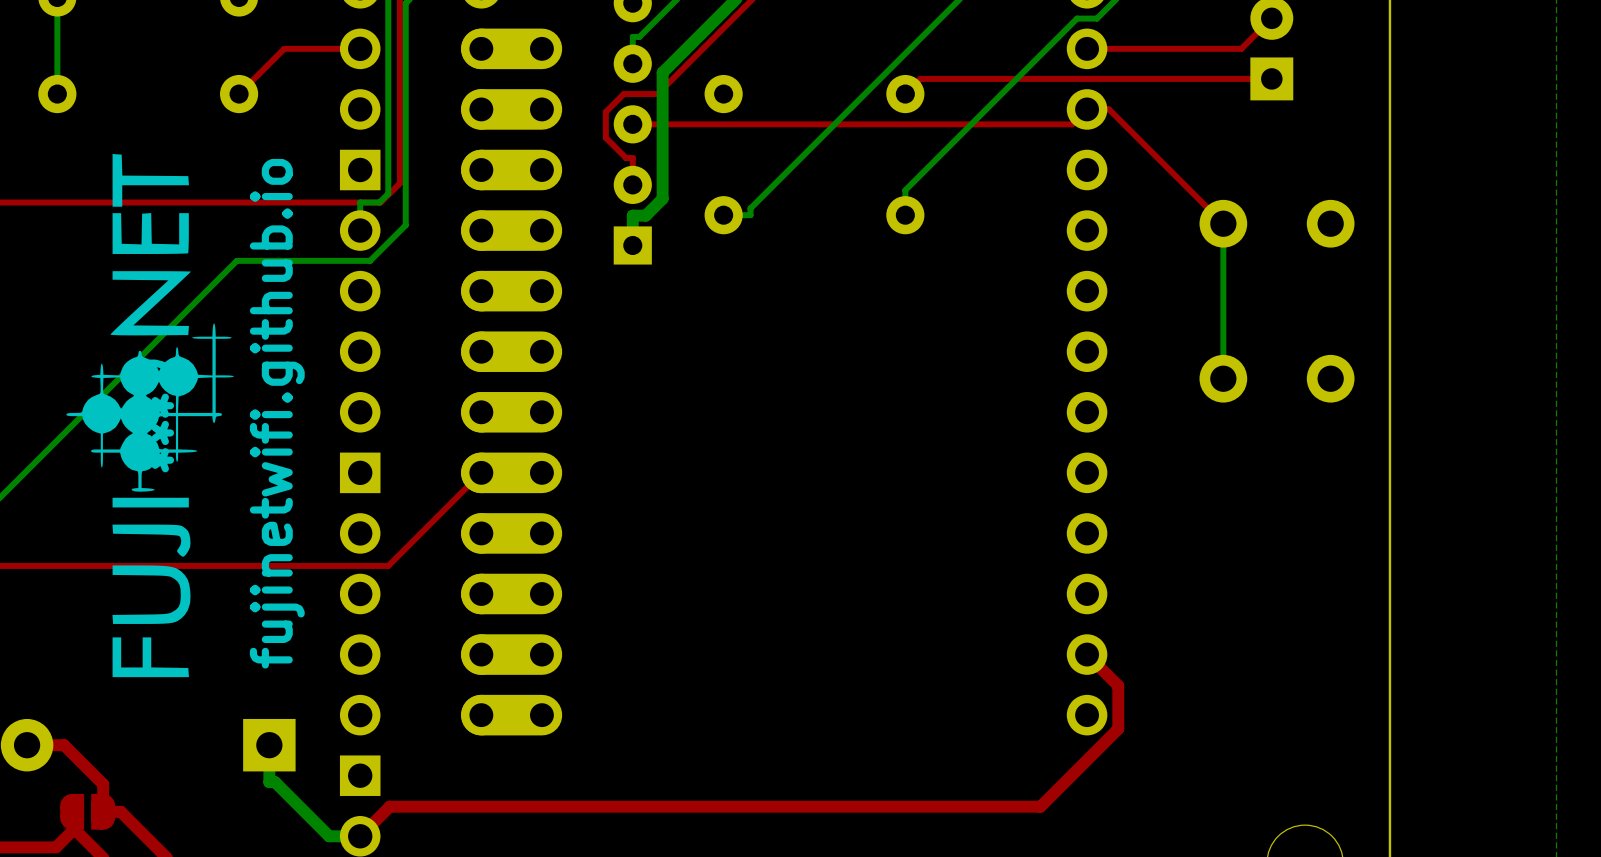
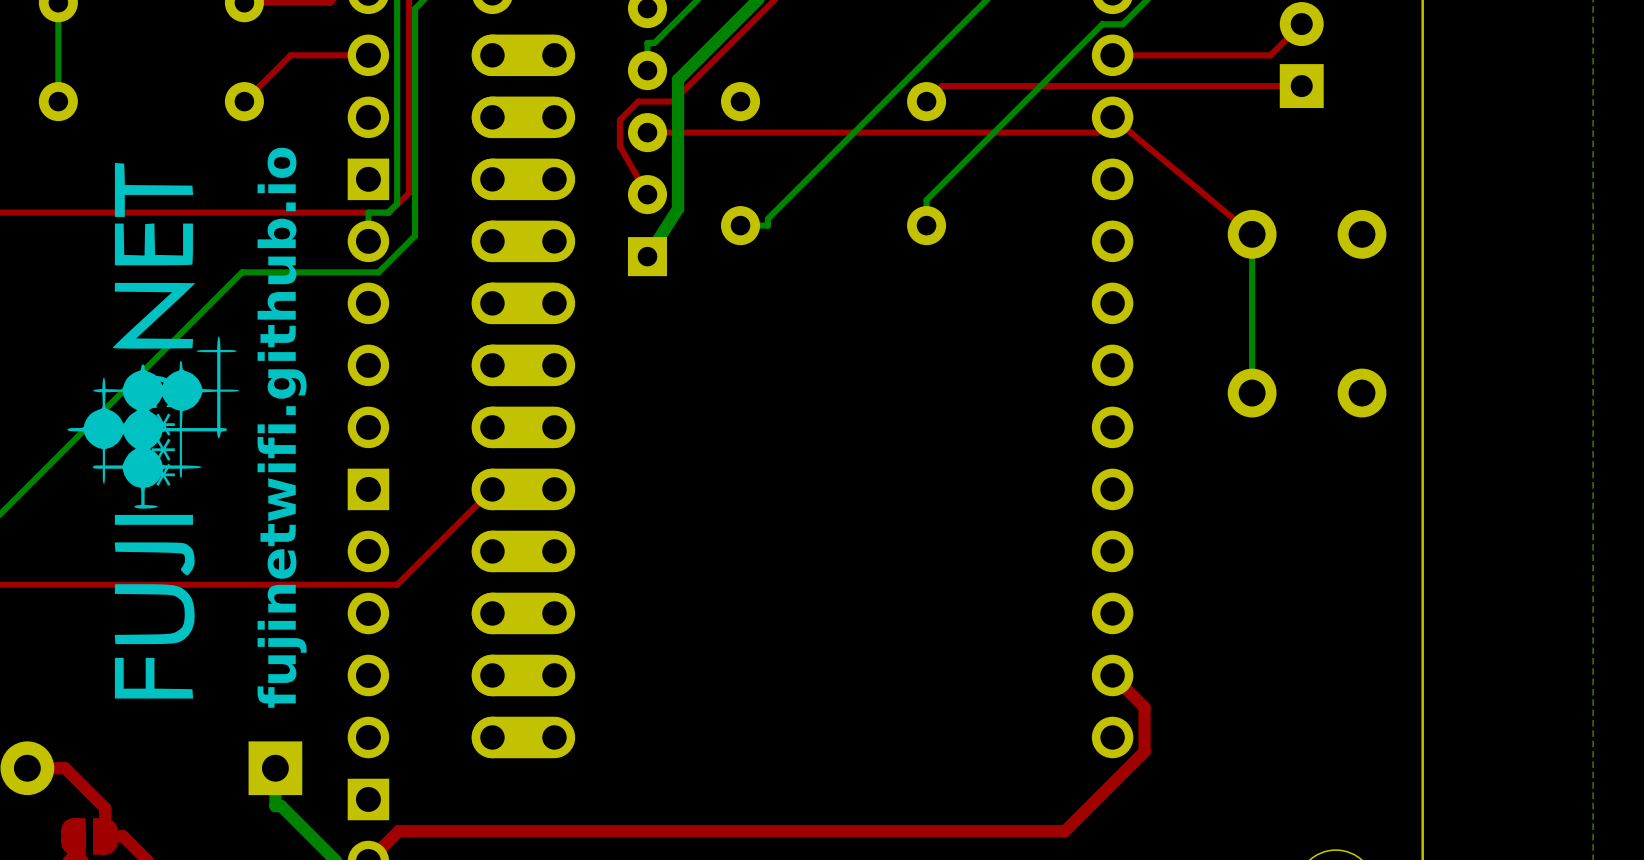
top track: (1087, 109) (1109, 109) (1223, 223) -> (1112, 117) (1252, 234)
top track: (605, 137) (626, 158) (632, 158) (632, 184) -> (619, 146) (647, 194)
bottom track: (662, 198) (645, 215) (632, 215) (632, 245) -> (678, 208) (647, 256)

